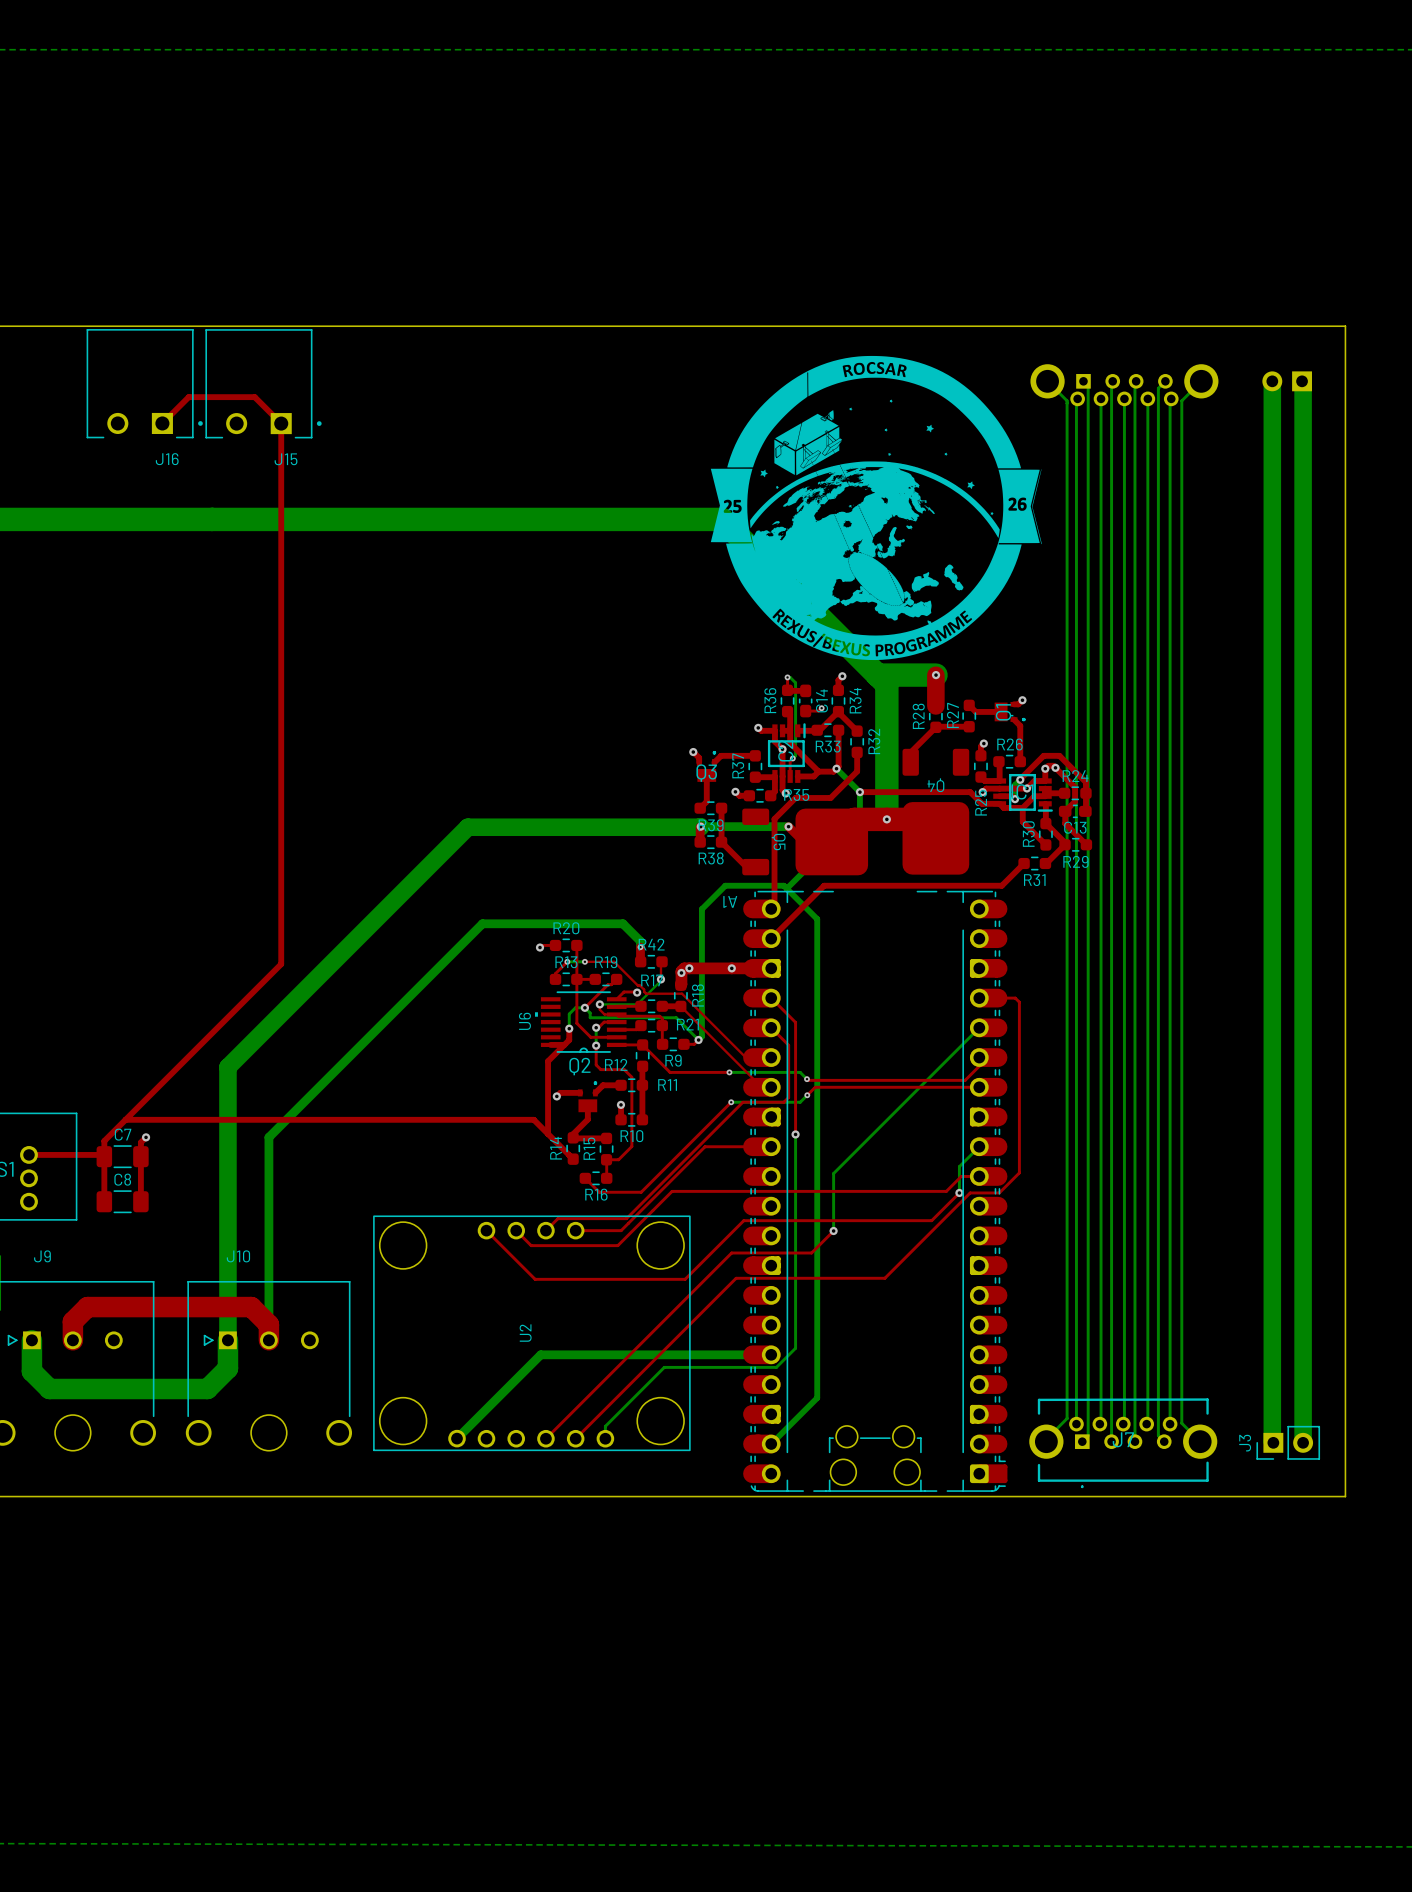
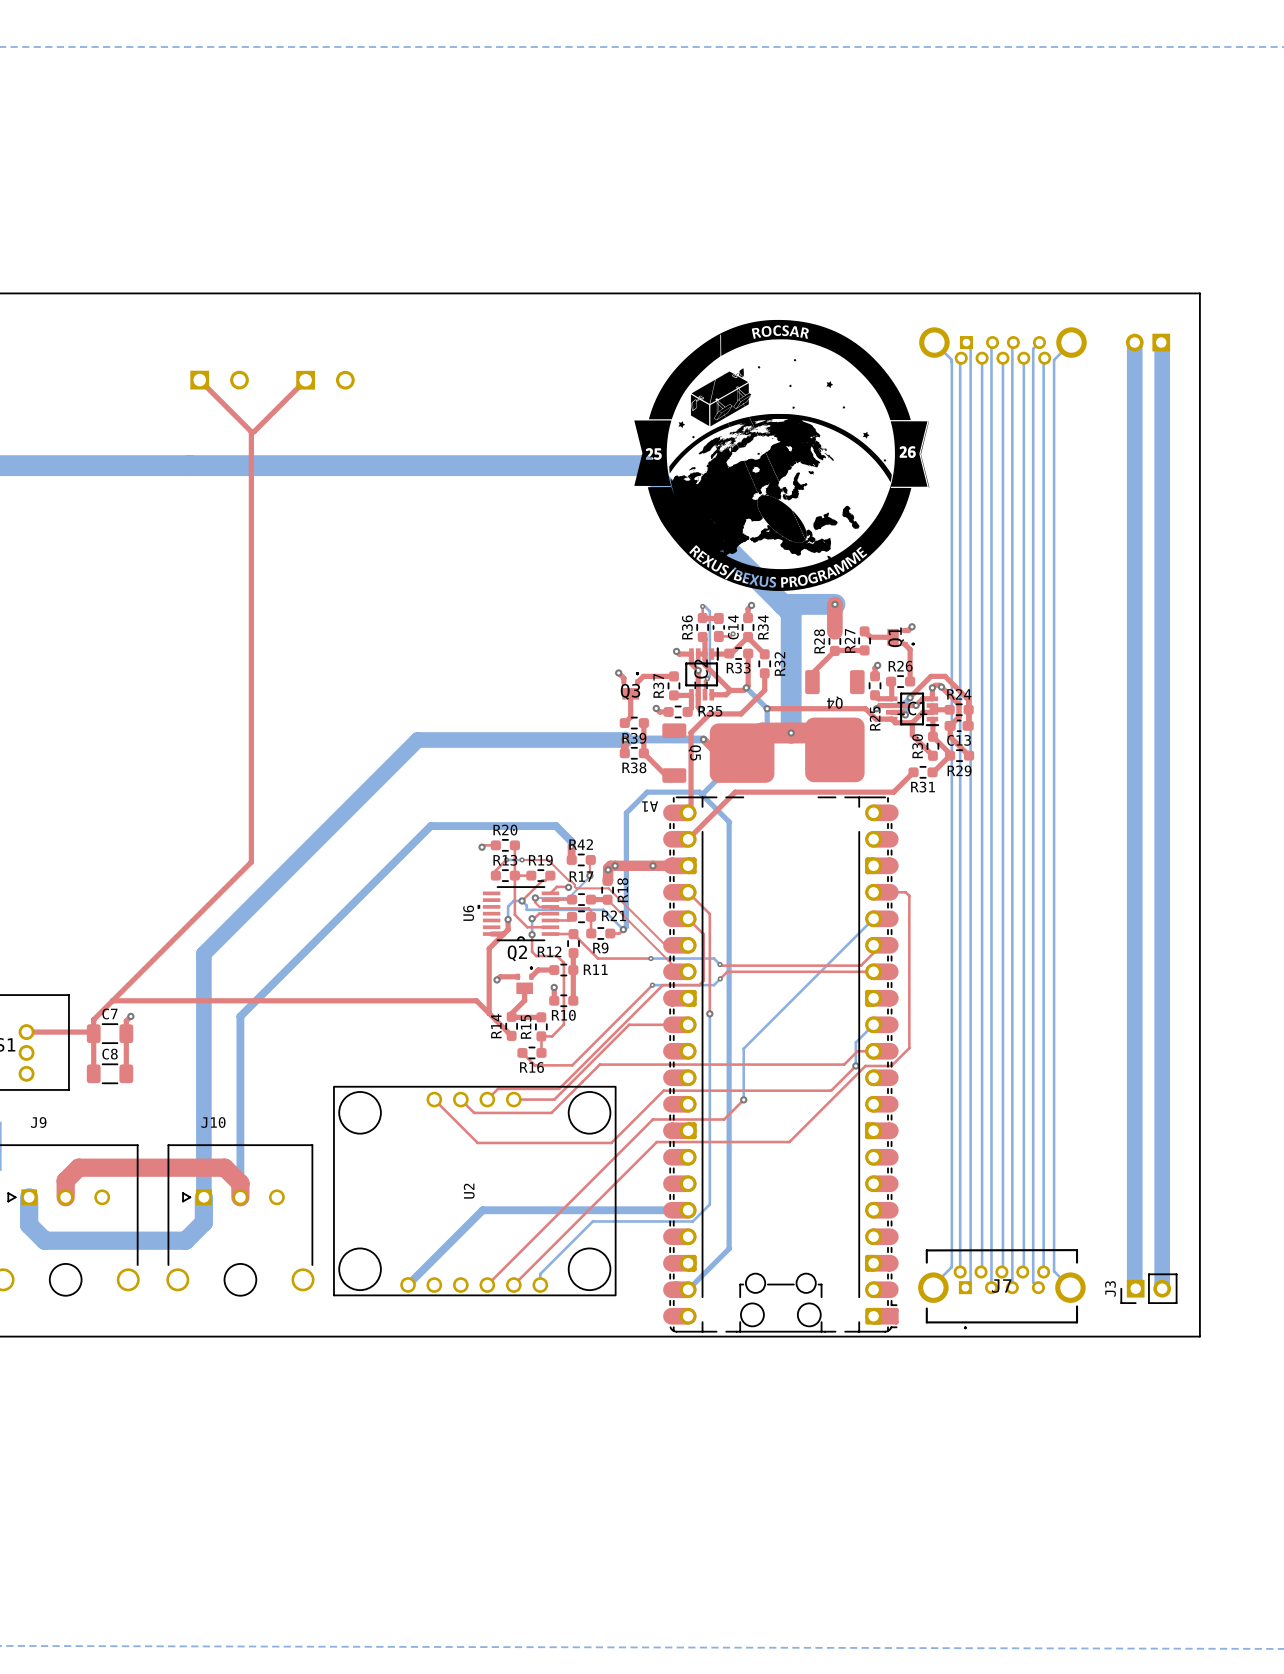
J16 side: top (144, 383) -> bottom (219, 380)
J15 side: top (263, 383) -> bottom (325, 380)
top track: (162, 423) (188, 397) (254, 397) (281, 423) (281, 481) -> none
top track: none -> (199, 380) (251, 431) (254, 431) (305, 380)

